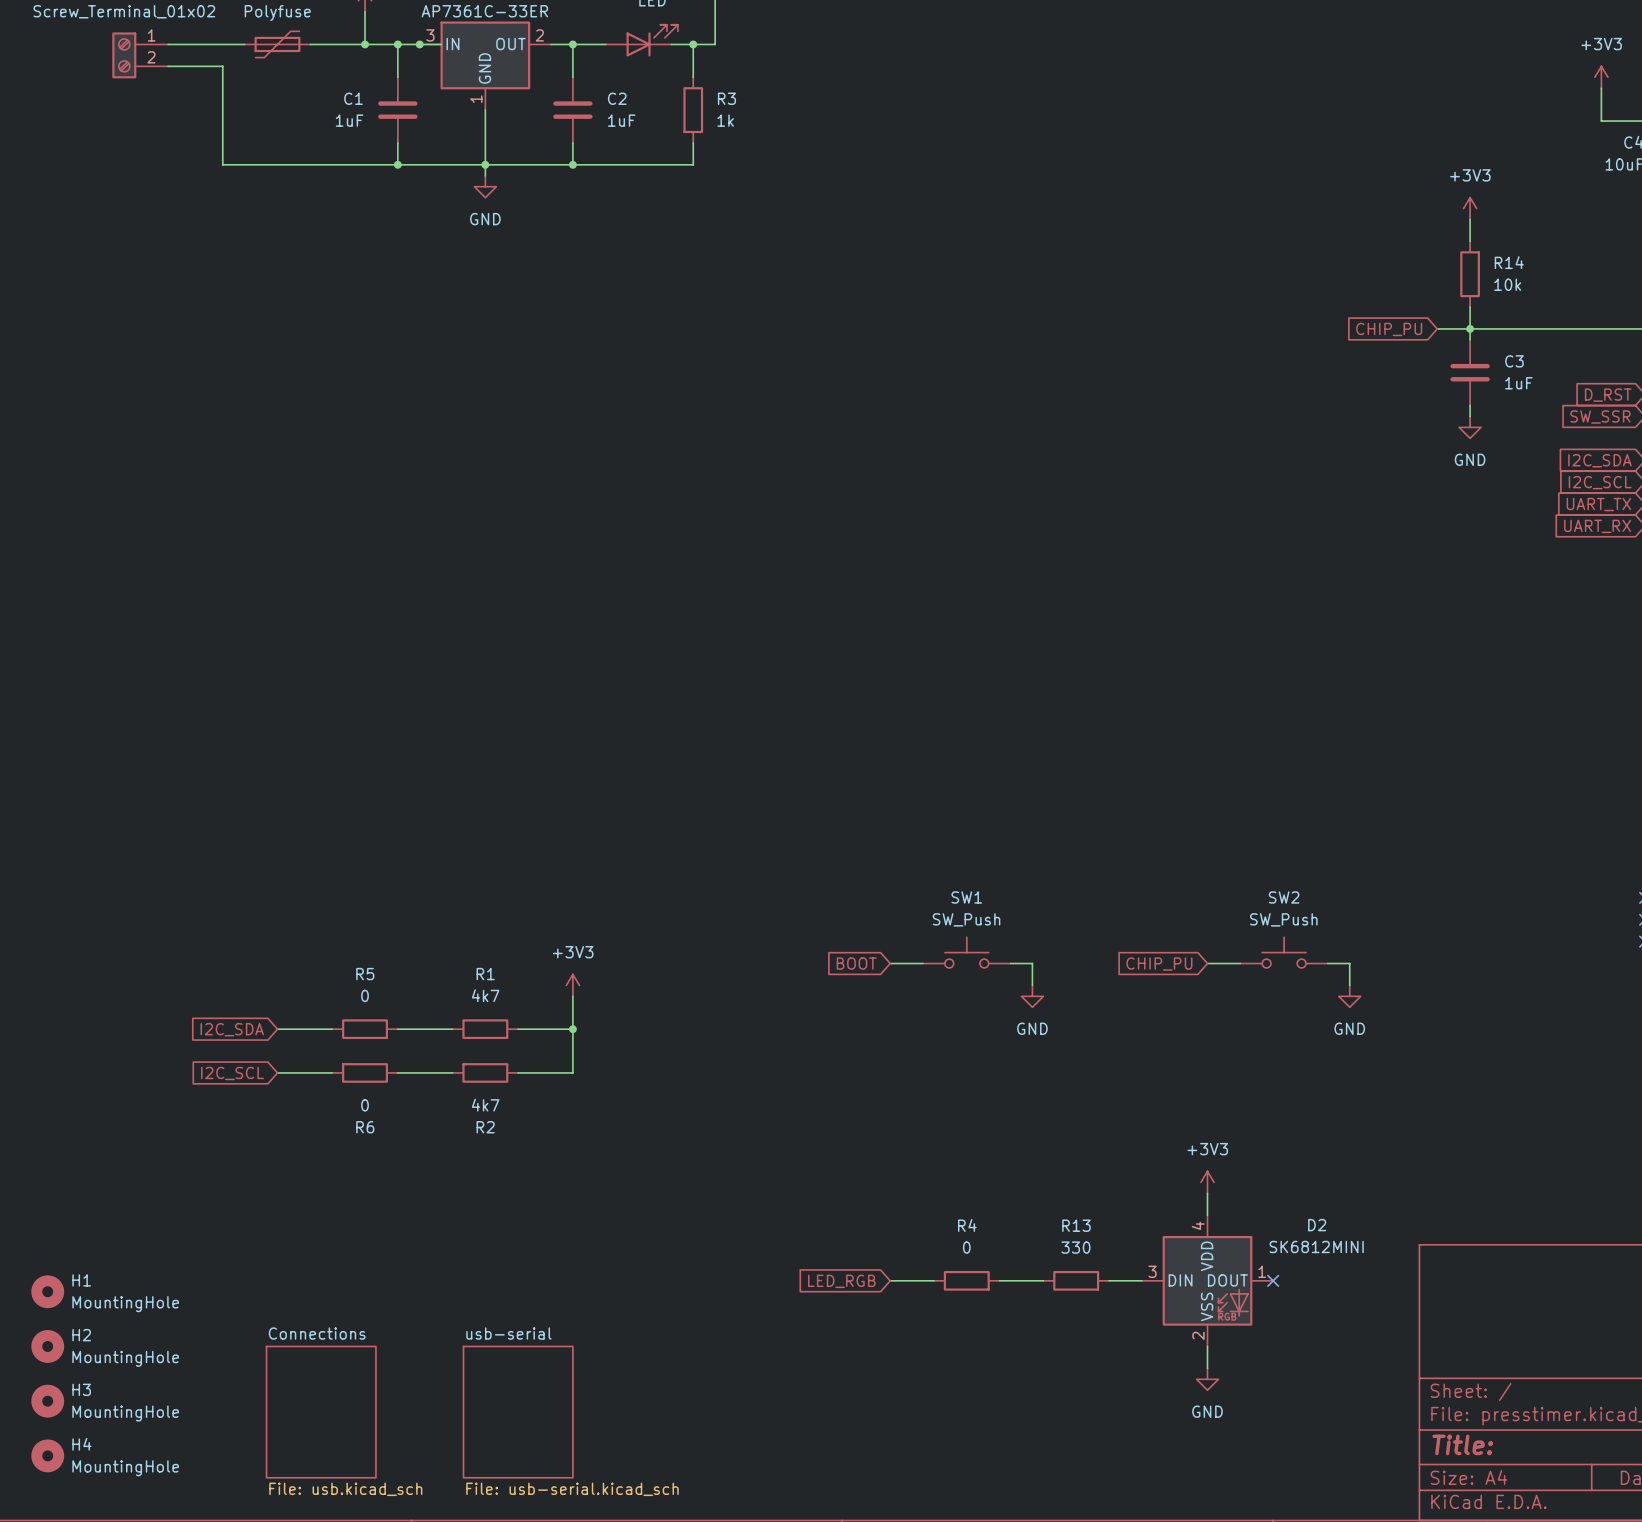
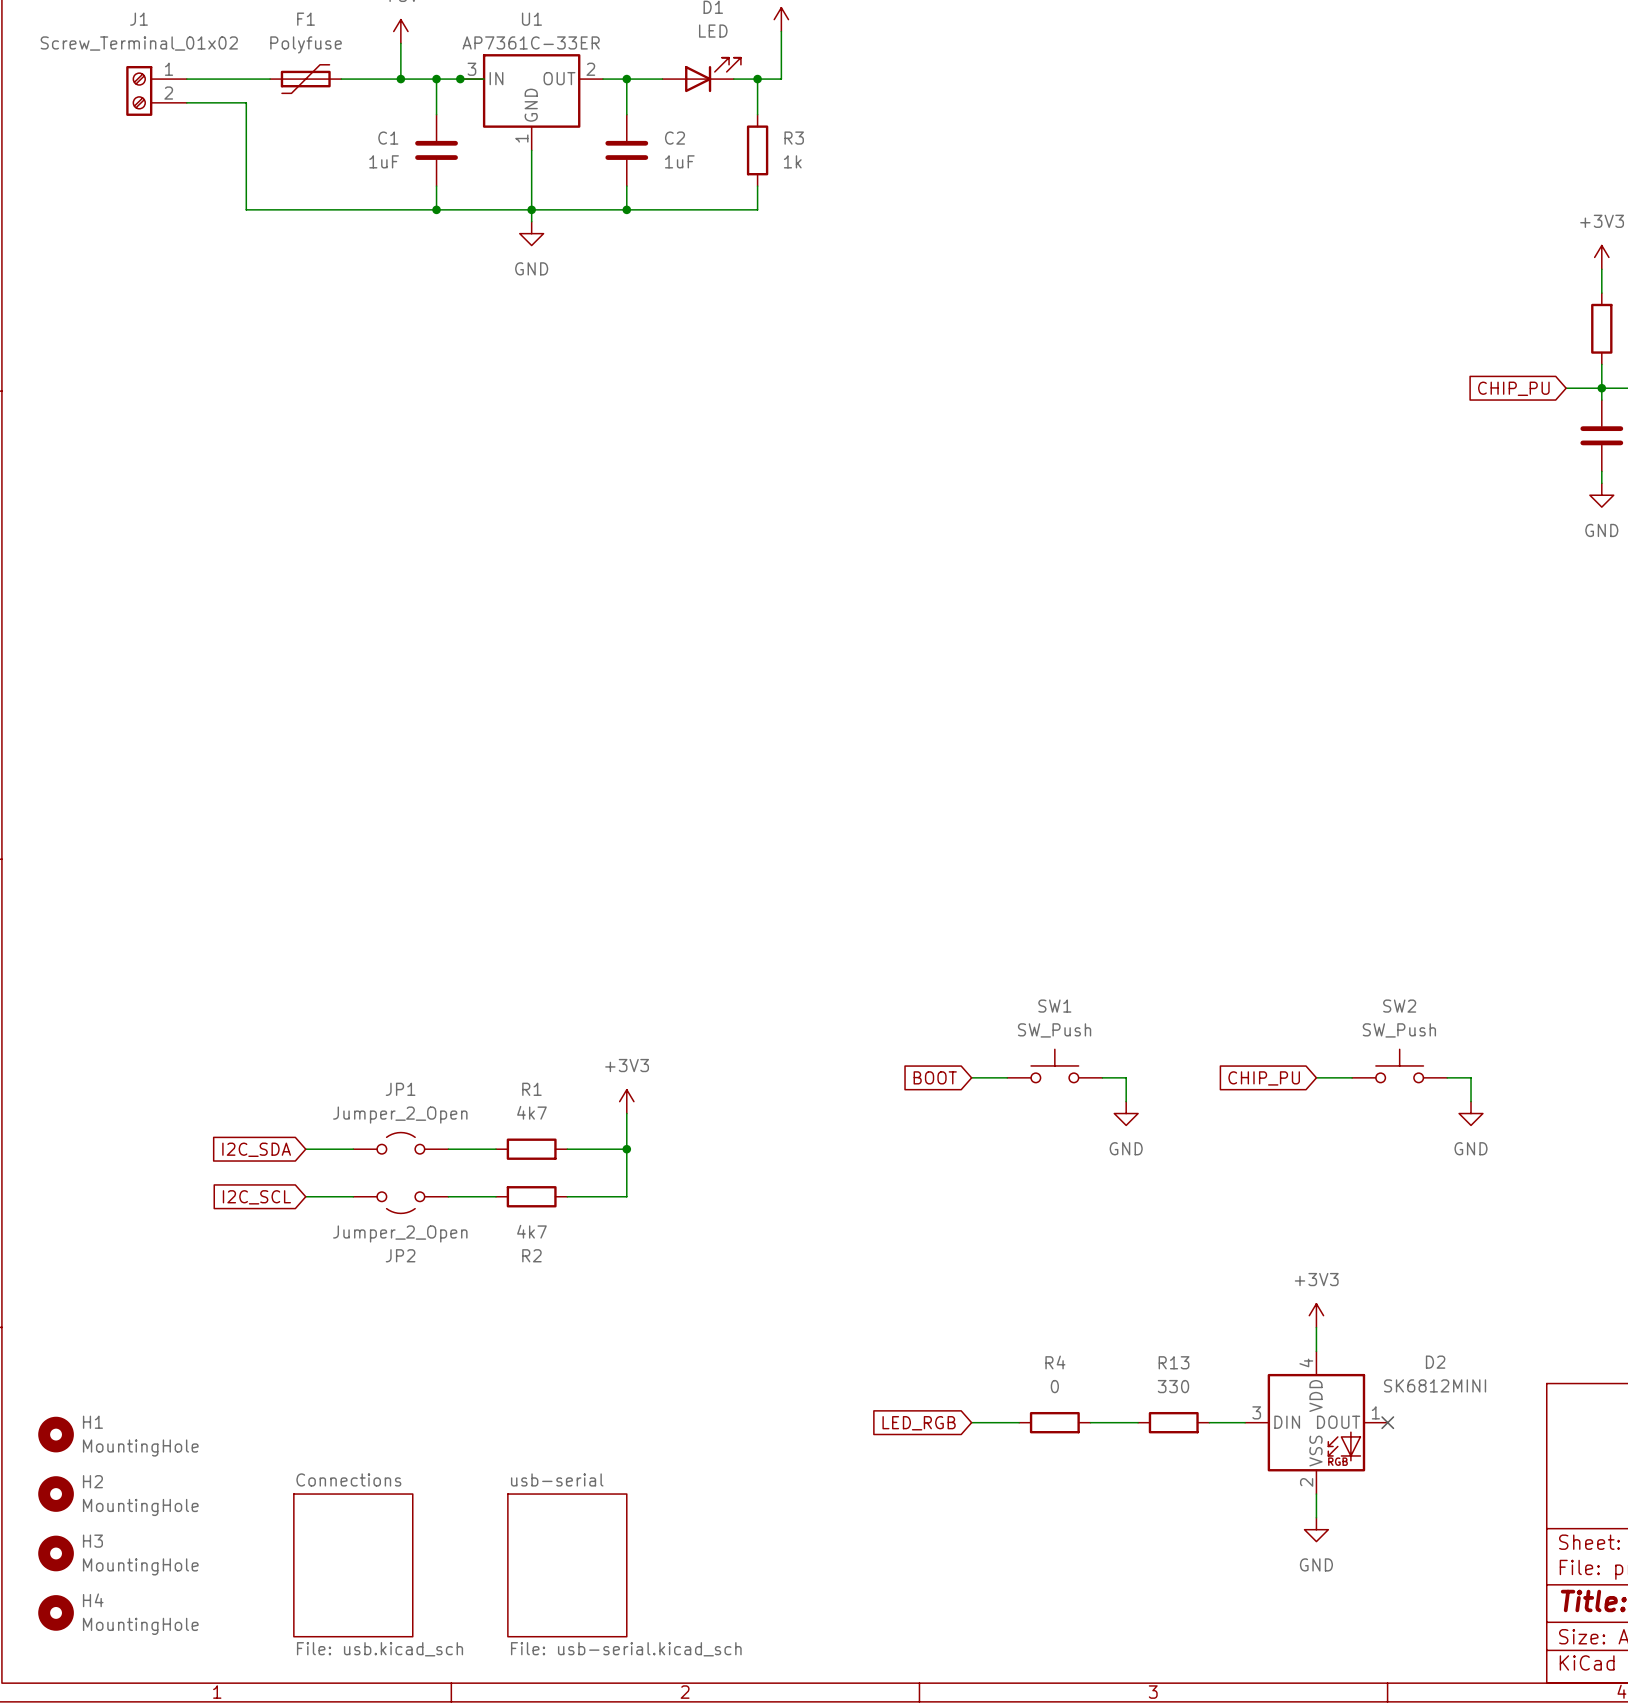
JP1: none -> Jumper_2_Open (400, 1143)
R5: 0 (365, 1029) -> none
R6: 0 (365, 1072) -> none
JP2: none -> Jumper_2_Open (400, 1202)

